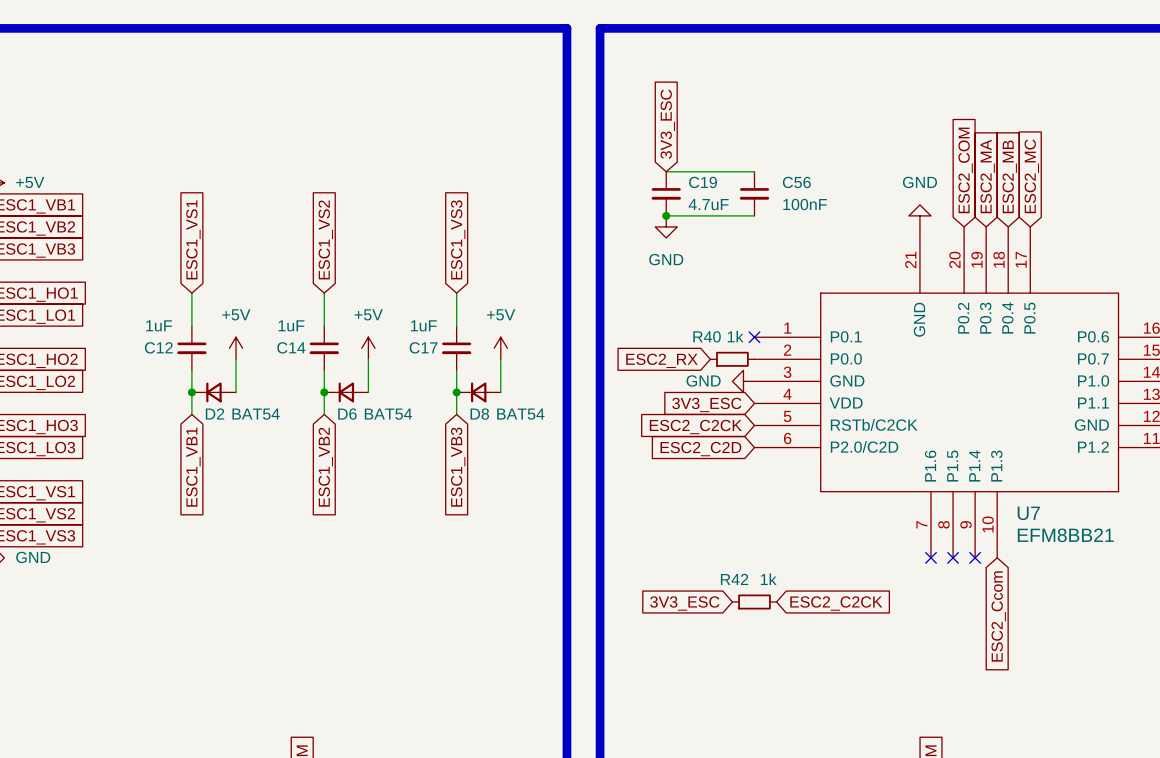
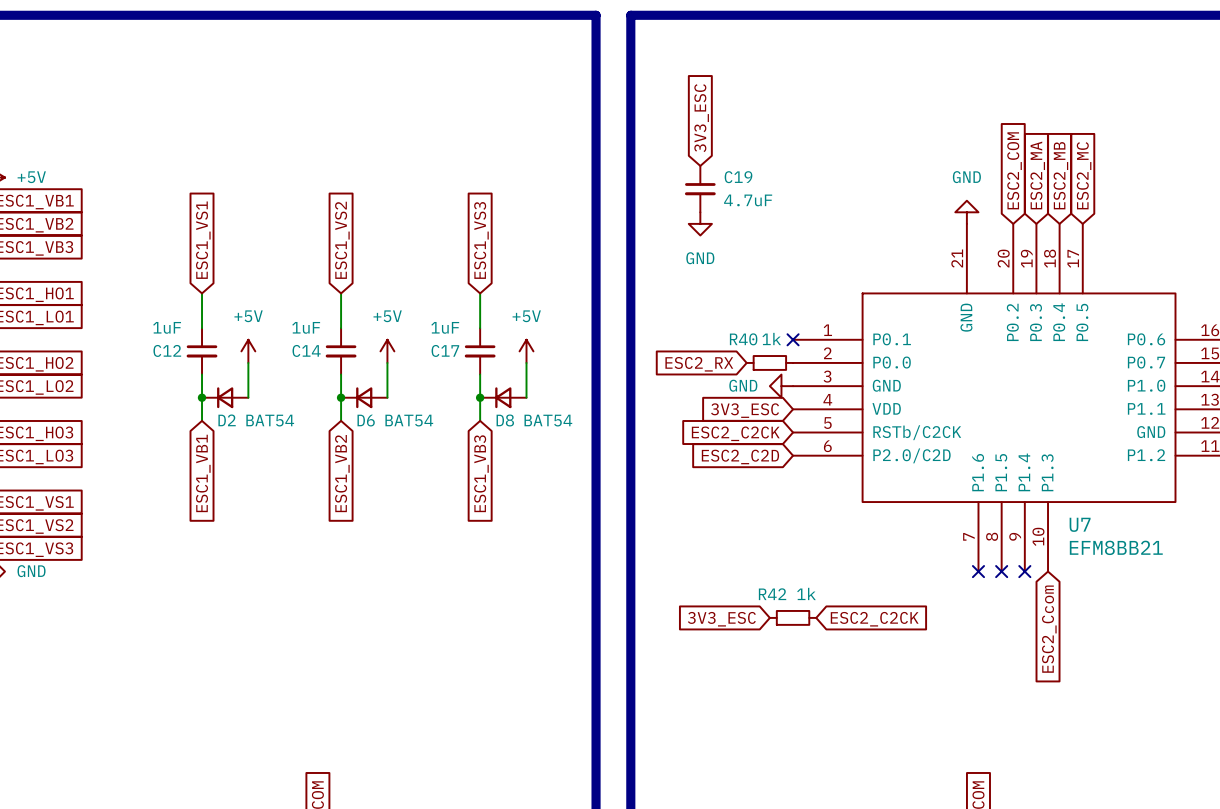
wire: (666, 171) (754, 171) -> none
C56: 100nF (754, 193) -> none
wire: (666, 215) (754, 215) -> none
junction: (666, 215) -> none

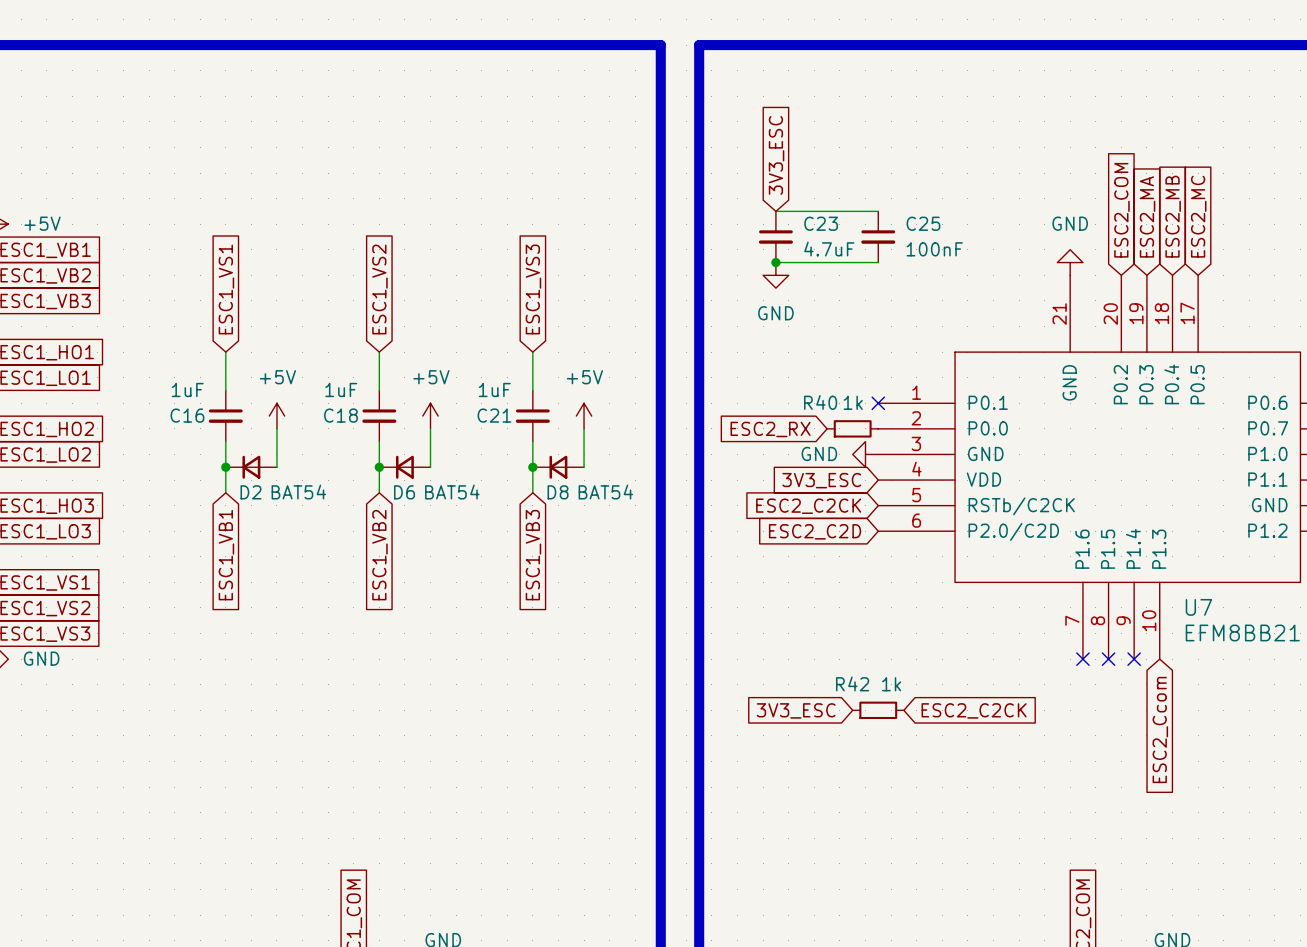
wire: none -> (775, 211) (878, 211)
C19 name: C19 (738, 177) -> C23 (821, 223)
C25: none -> 100nF (878, 236)
wire: none -> (775, 262) (878, 262)
junction: none -> (775, 262)
C12 name: C12 (167, 350) -> C16 (187, 415)
C14 name: C14 (306, 350) -> C18 (340, 415)
C17 name: C17 (445, 350) -> C21 (494, 415)

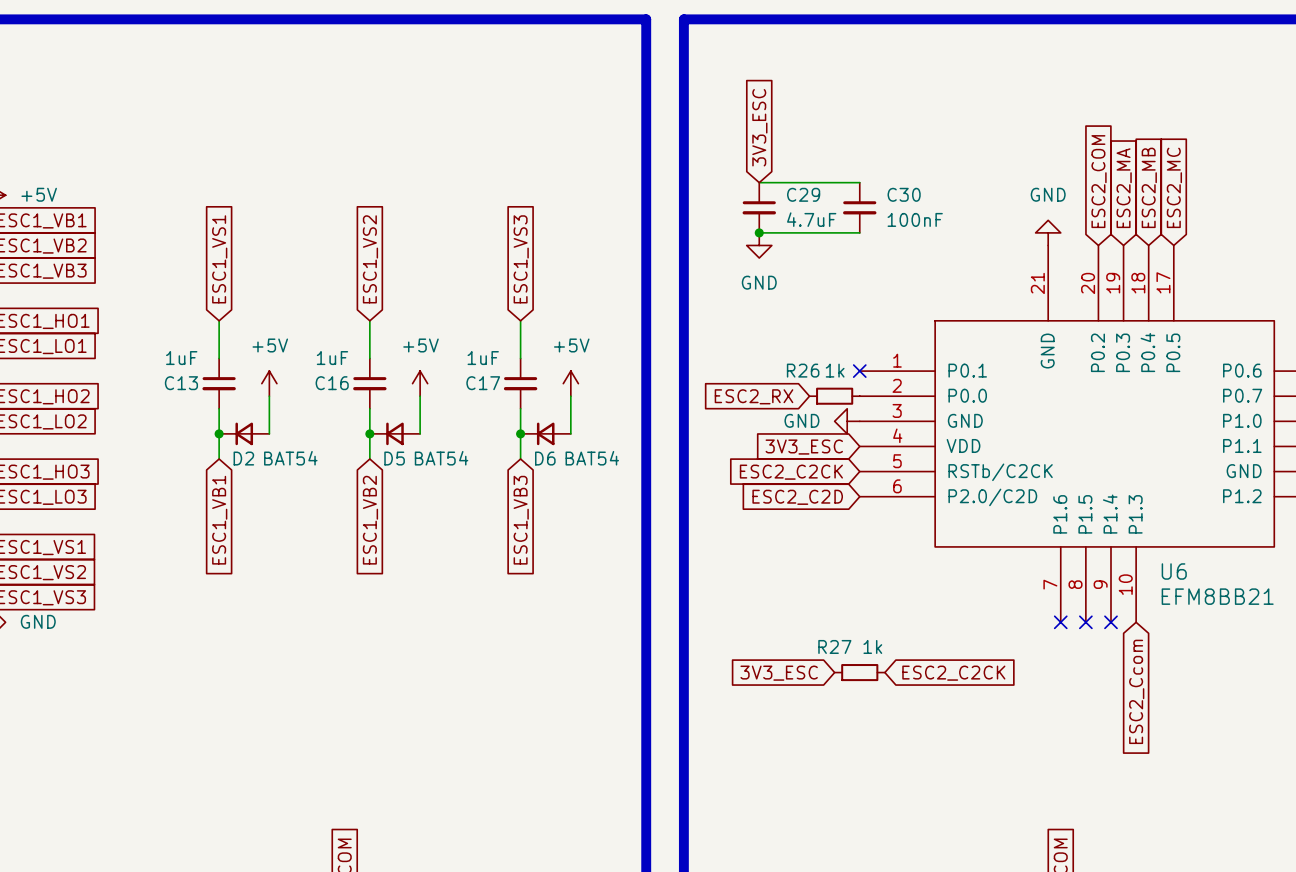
C23 name: C23 (821, 223) -> C29 (803, 194)
C25 name: C25 (923, 223) -> C30 (904, 194)
R40 name: R40 (820, 402) -> R26 (803, 370)
C16 name: C16 (187, 415) -> C13 (181, 383)
C18 name: C18 (340, 415) -> C16 (332, 383)
C21 name: C21 (494, 415) -> C17 (483, 383)
D6 name: D6 (404, 492) -> D5 (394, 458)
D8 name: D8 (558, 492) -> D6 (545, 458)
U7 name: U7 (1198, 607) -> U6 (1174, 571)
R42 name: R42 (852, 683) -> R27 (834, 646)

